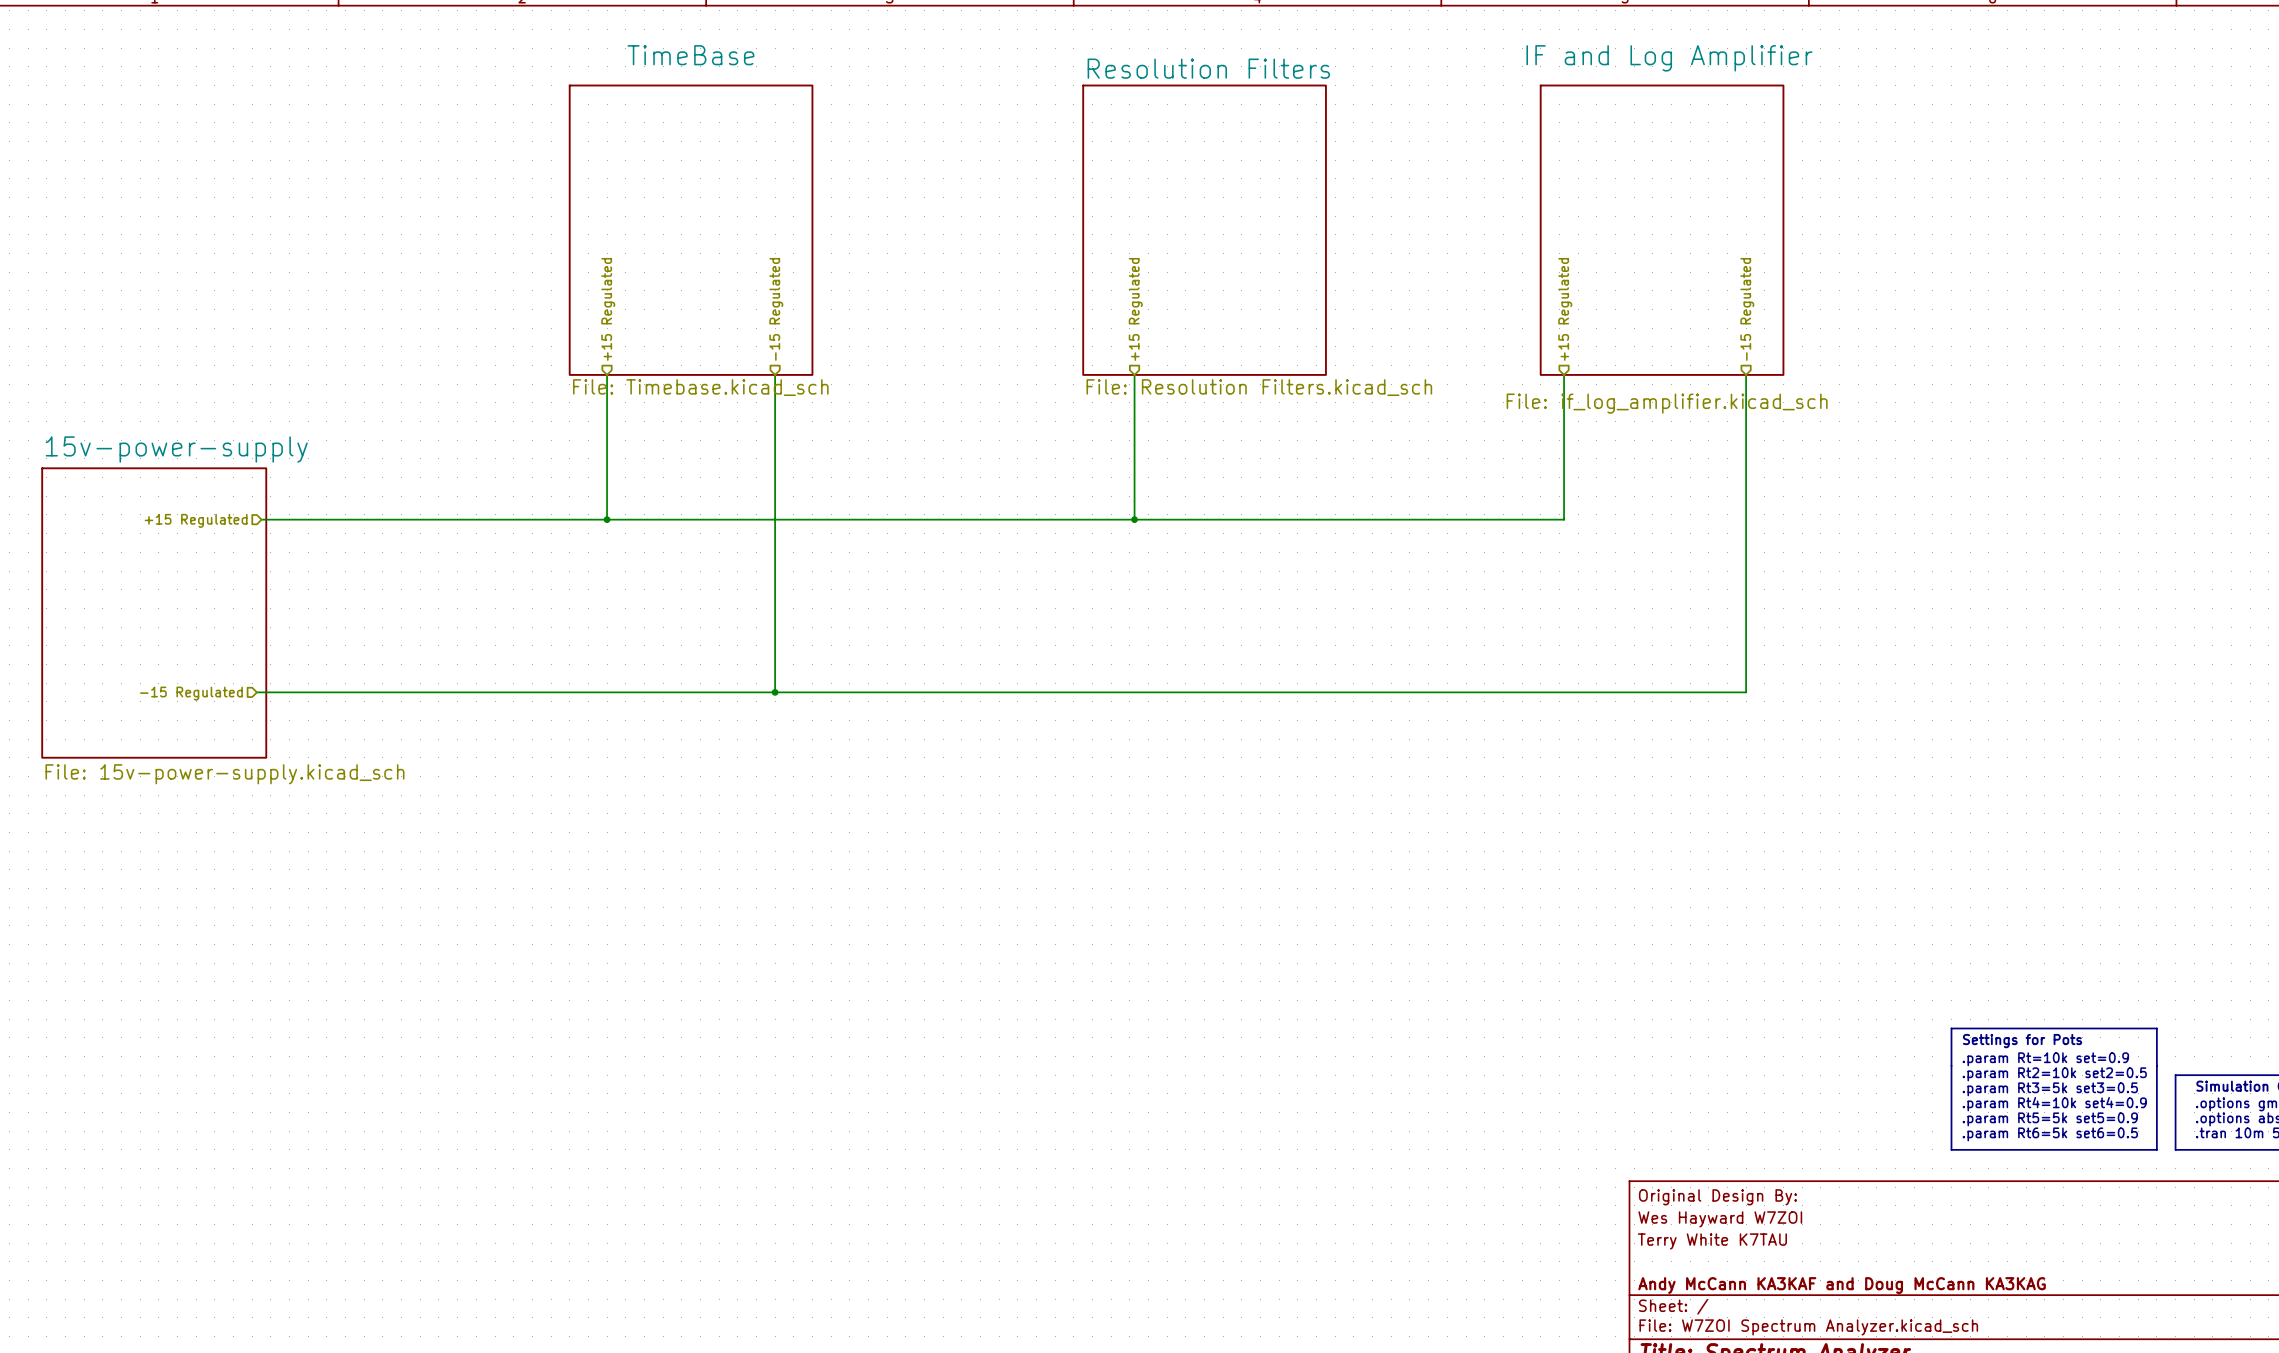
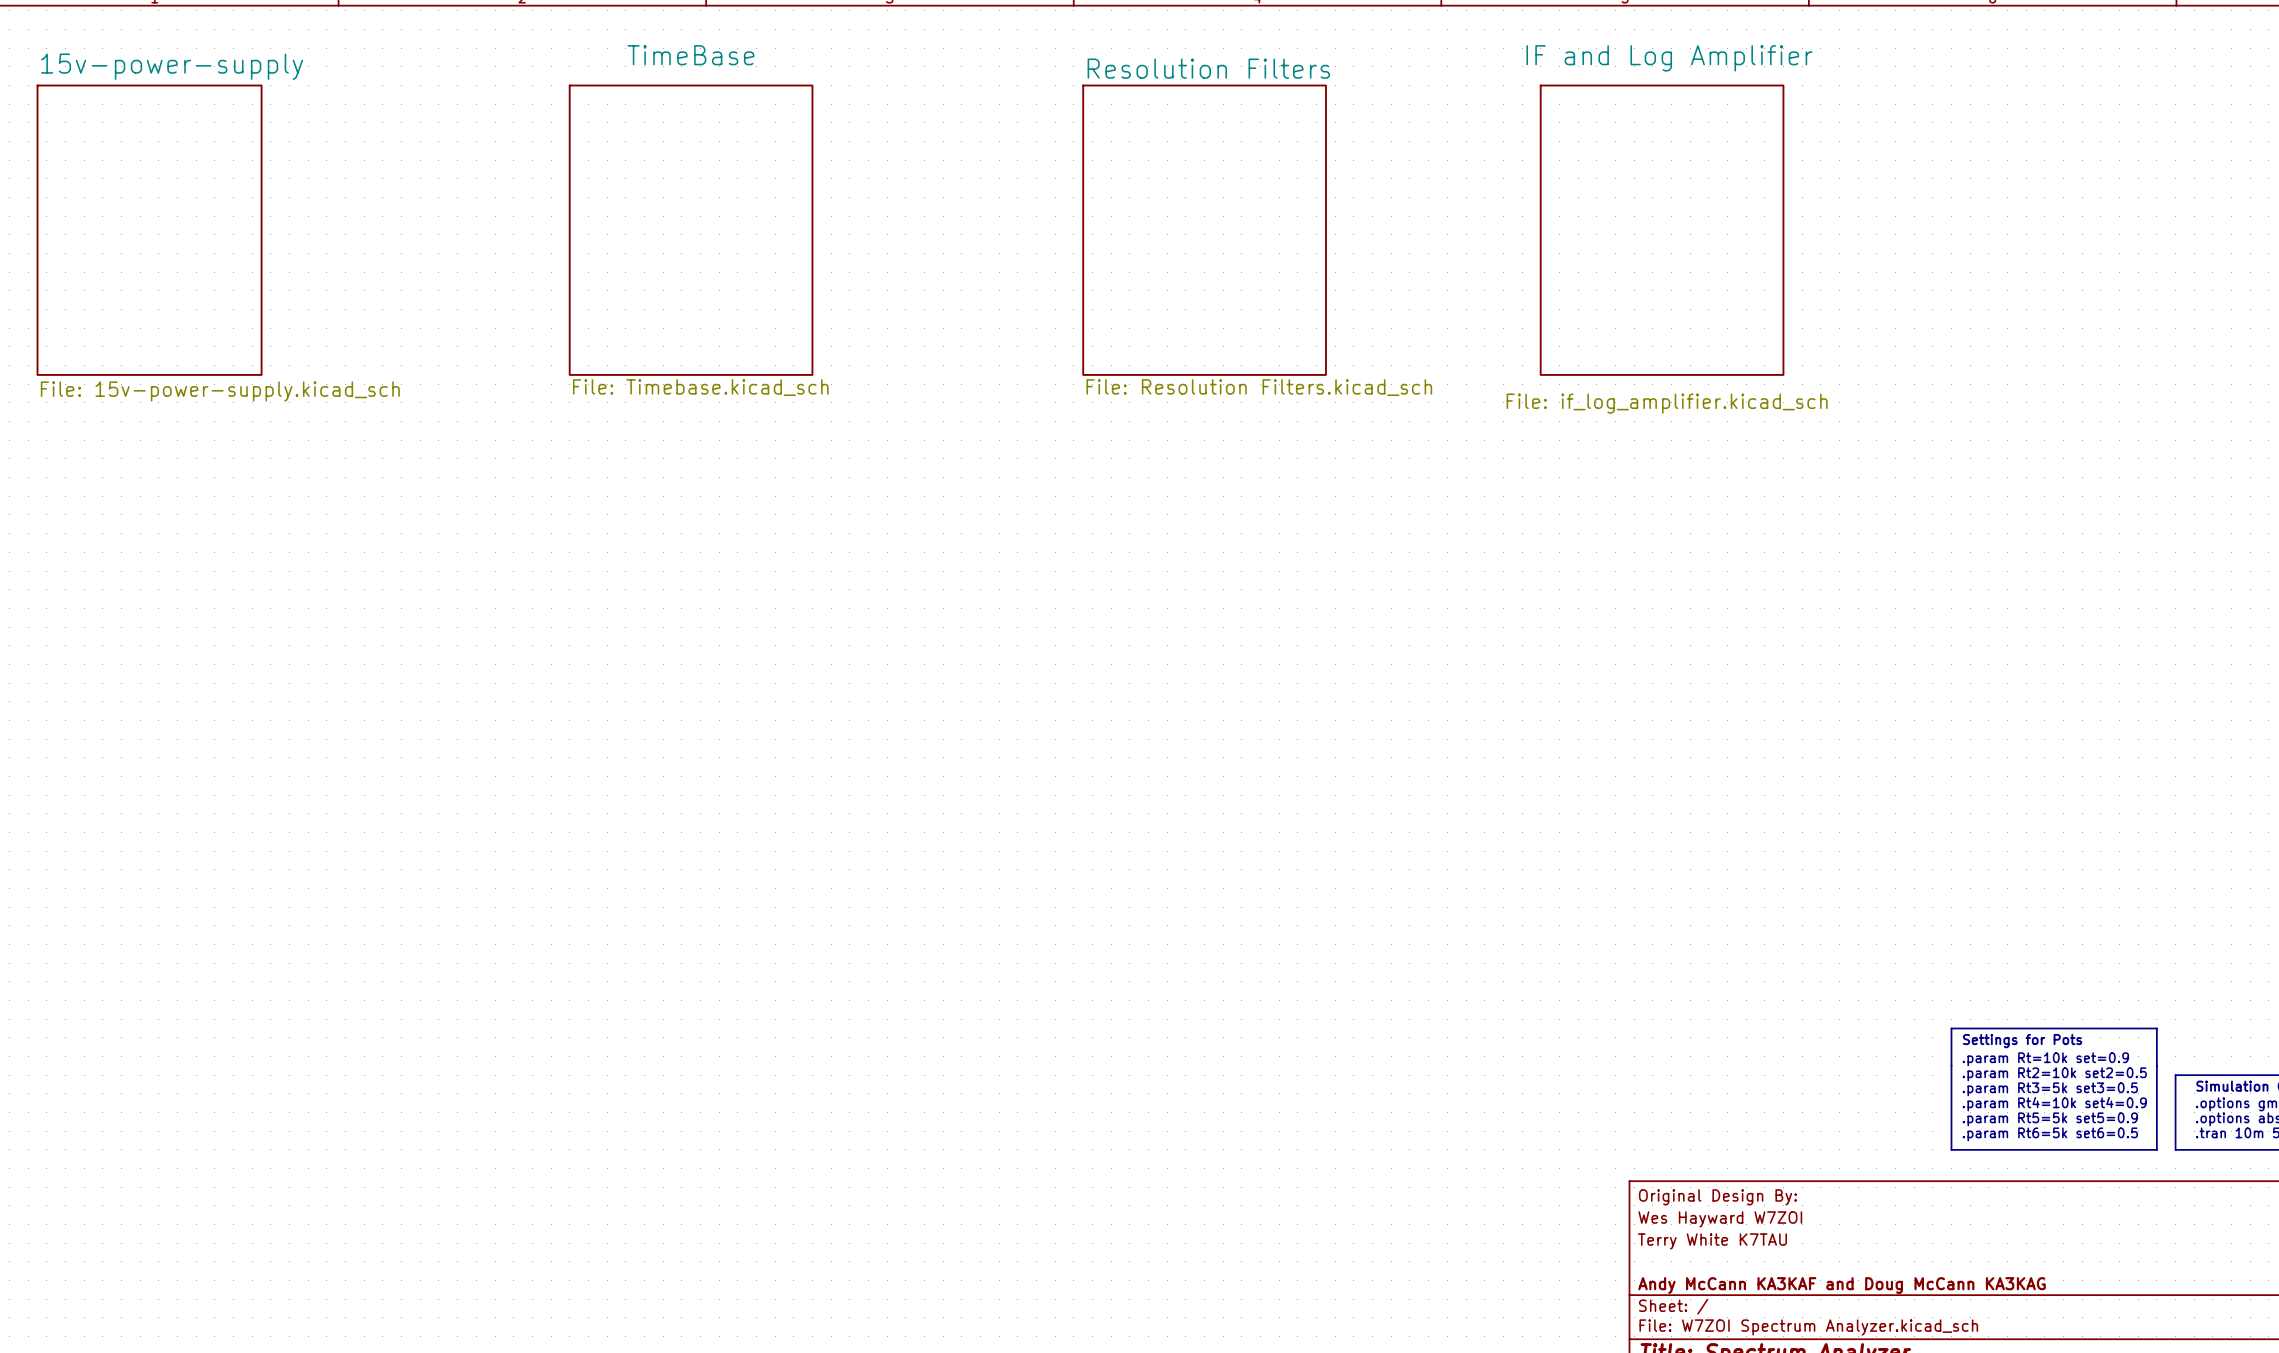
hierarchical label: +15 Regulated (608, 309) -> none
hierarchical label: -15 Regulated (776, 309) -> none
hierarchical label: +15 Regulated (1135, 309) -> none
hierarchical label: +15 Regulated (1565, 309) -> none
hierarchical label: -15 Regulated (1747, 309) -> none
wire: (607, 374) (607, 519) -> none
wire: (775, 374) (775, 692) -> none
wire: (1134, 374) (1134, 519) -> none
wire: (1564, 374) (1564, 519) (261, 519) -> none
wire: (1746, 374) (1746, 692) (256, 692) -> none
junction: (607, 519) -> none
junction: (1134, 519) -> none
hierarchical label: +15 Regulated (196, 520) -> none
sheet 15v-power-supply position: (154, 613) -> (149, 230)
junction: (775, 692) -> none
hierarchical label: -15 Regulated (191, 693) -> none

